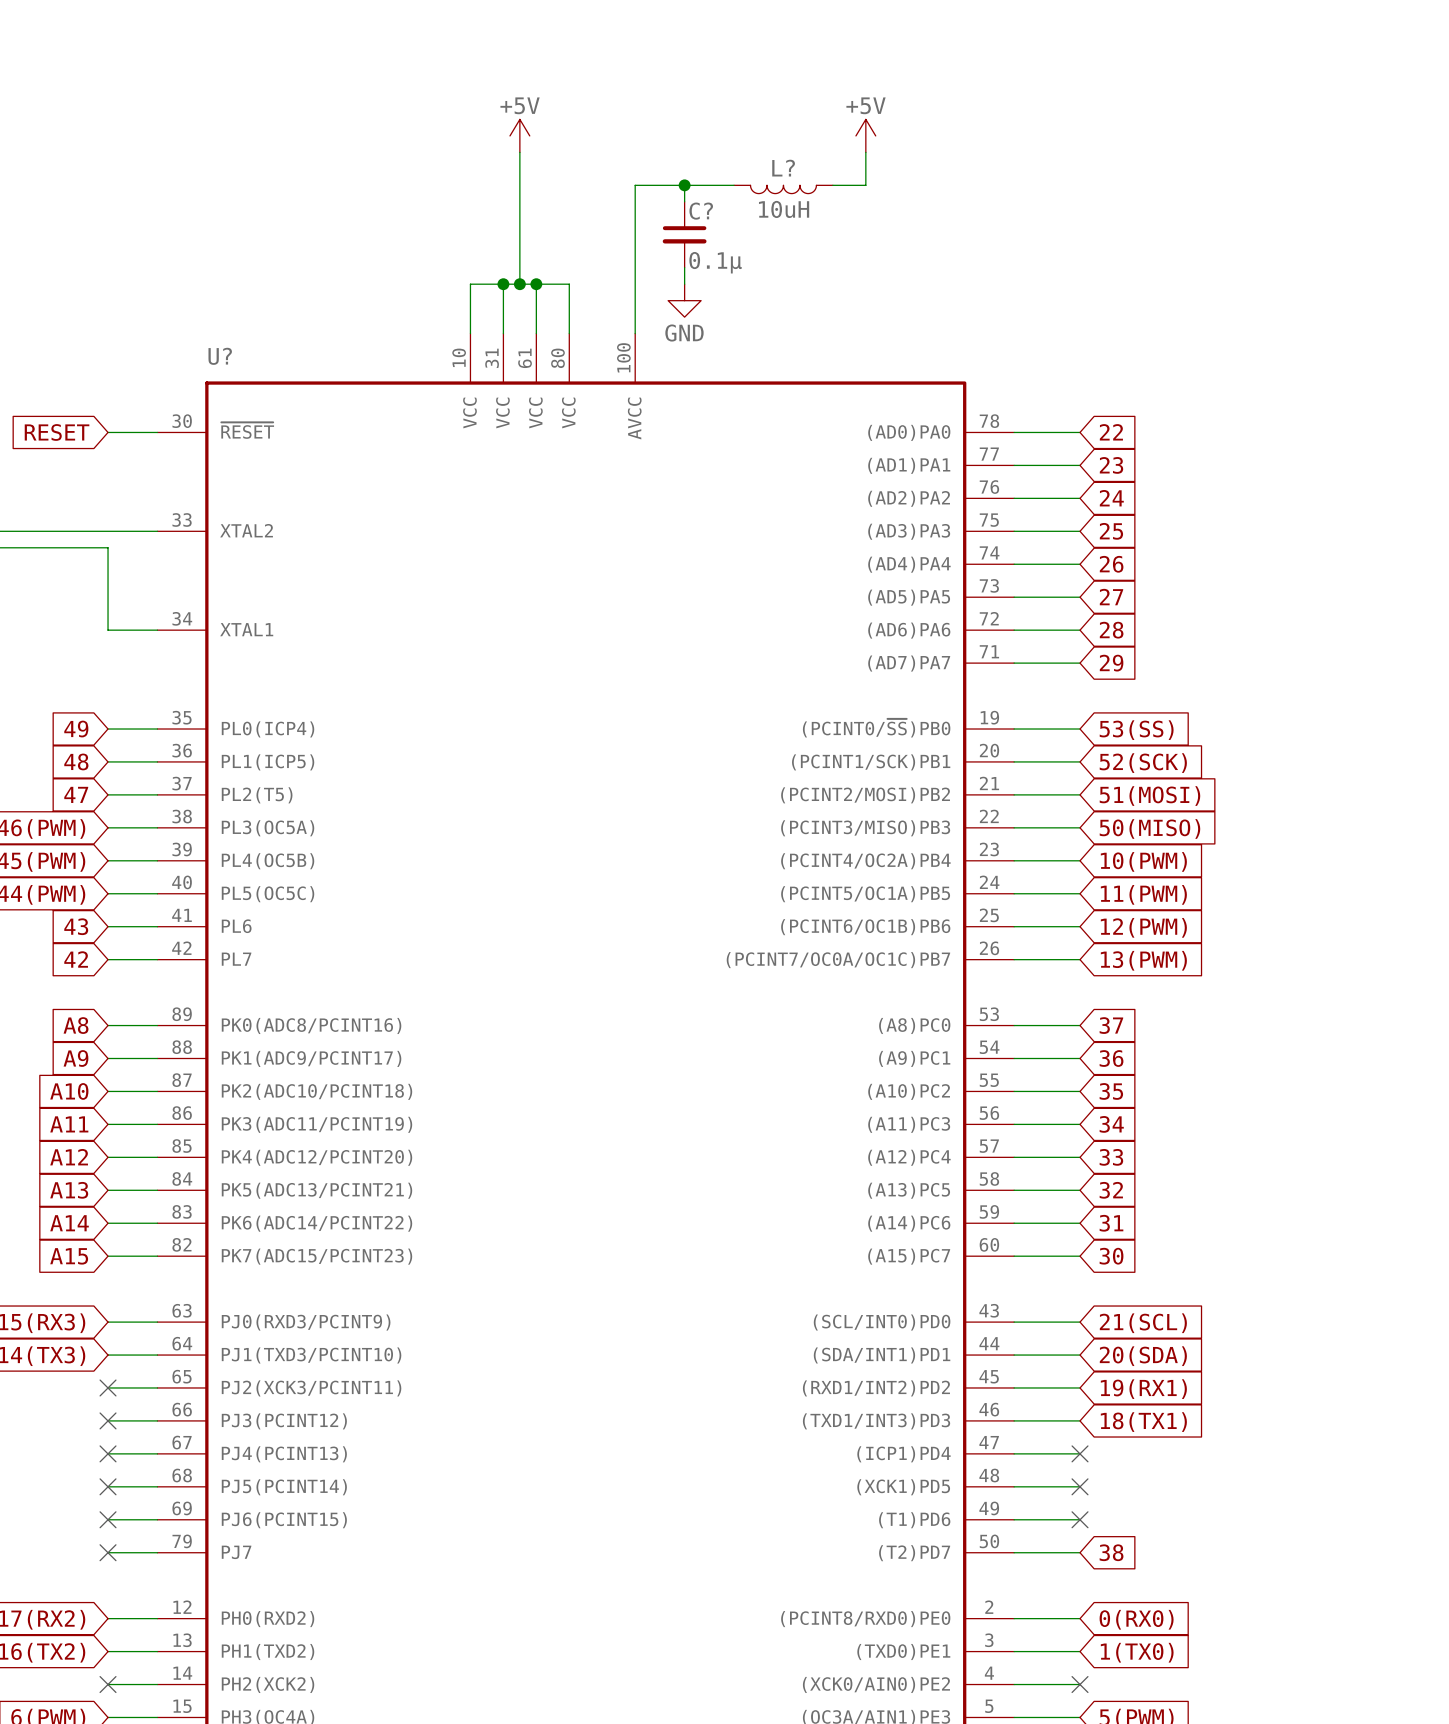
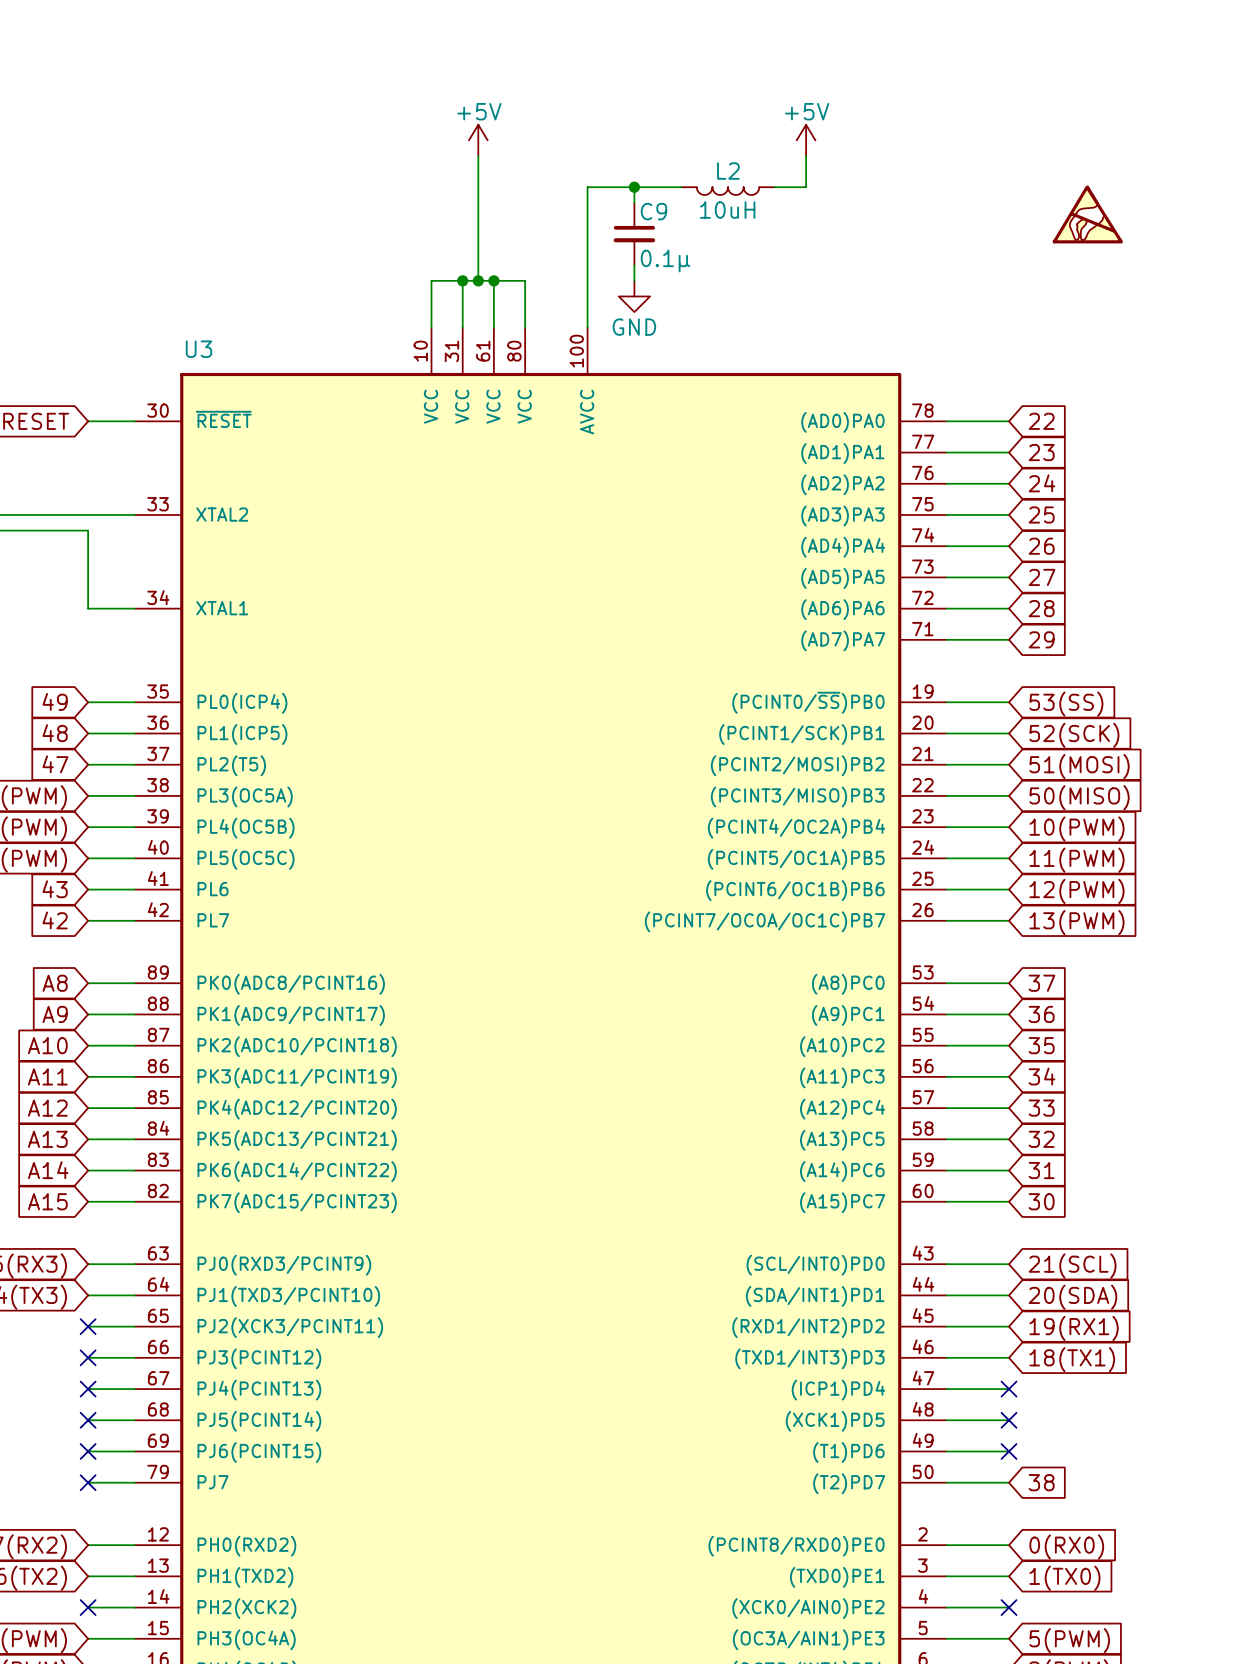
L? name: L? (783, 168) -> L2 (728, 171)
C? name: C? (701, 211) -> C9 (653, 211)
power symbol: none -> (1087, 214)
U? name: U? (220, 356) -> U3 (198, 349)

